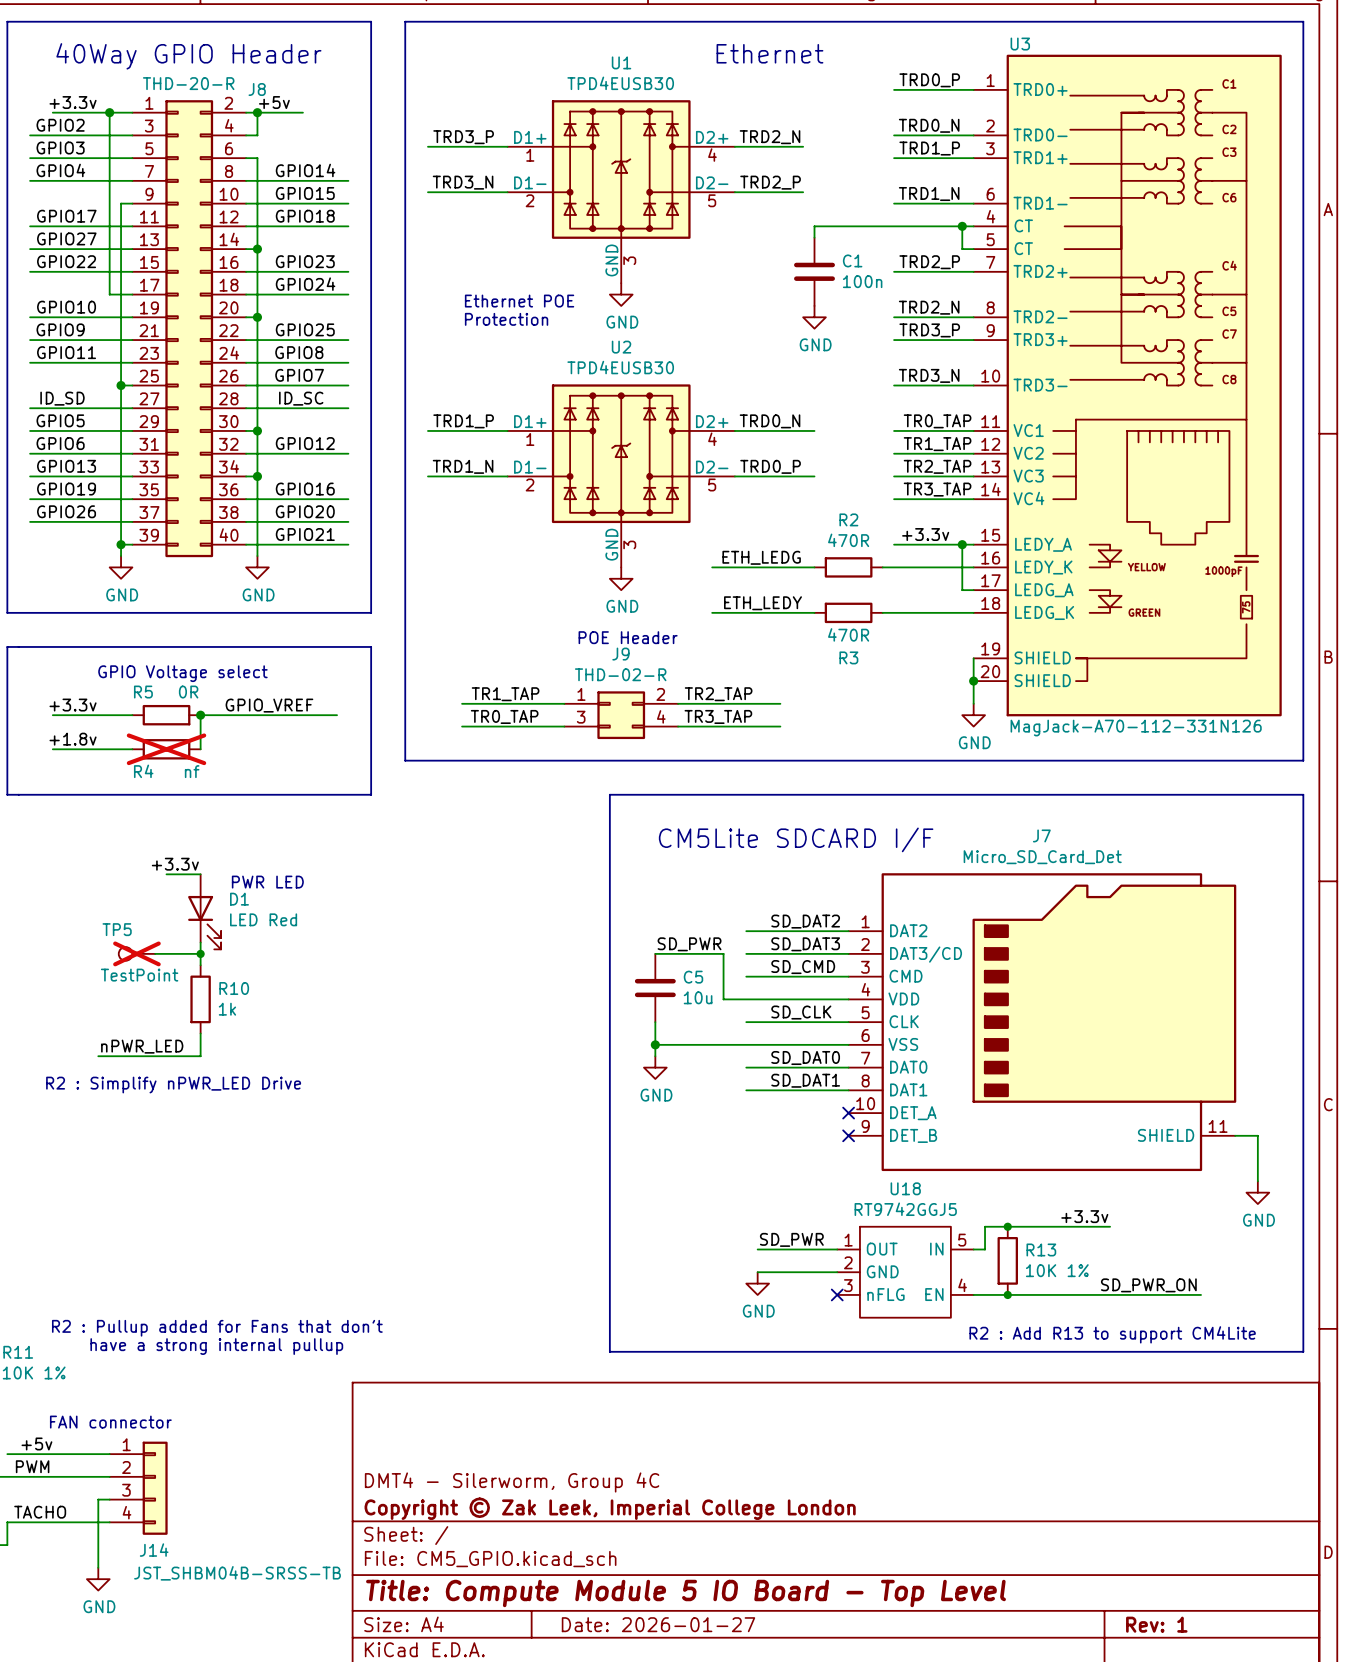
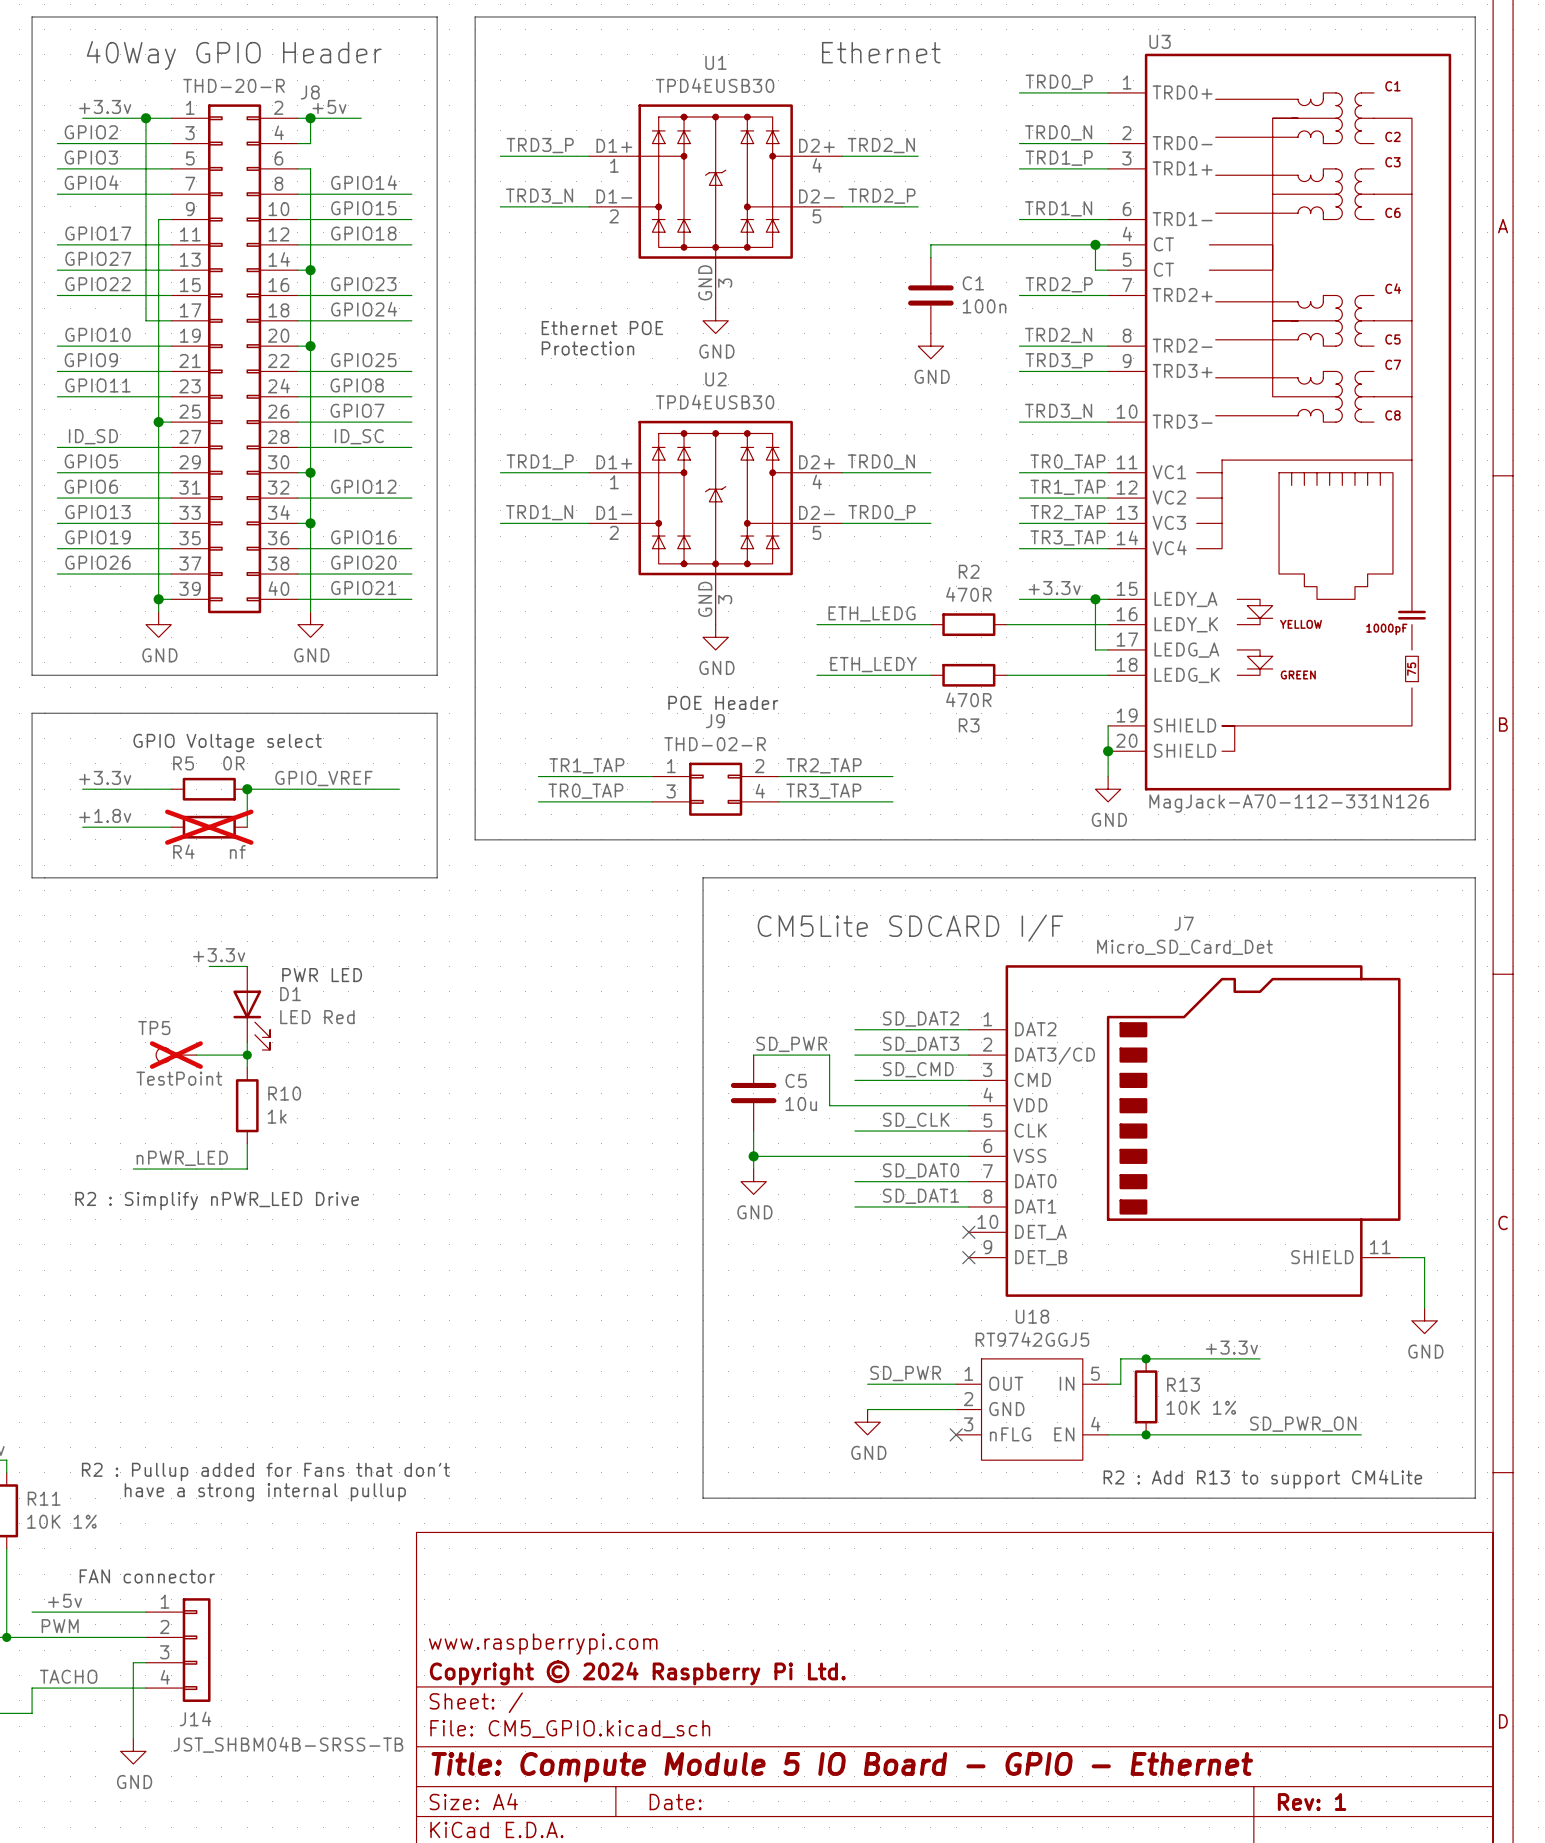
title block: DMT4 - Silerworm, Group 4C (512, 1482) -> www.raspberrypi.com (543, 1644)
title block: Copyright © Zak Leek, Imperial College London (610, 1508) -> Copyright © 2024 Raspberry Pi Ltd. (637, 1672)
title block: Title: Compute Module 5 IO Board - Top Level (686, 1593) -> Title: Compute Module 5 IO Board - GPIO - Ethernet (842, 1767)
title block: Date: 2026-01-27 (658, 1624) -> Date: (675, 1802)

